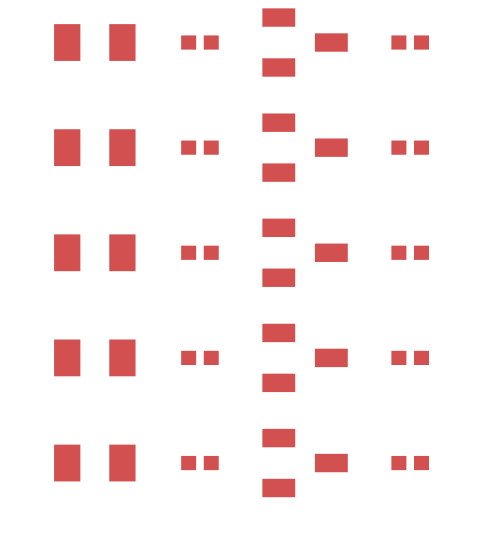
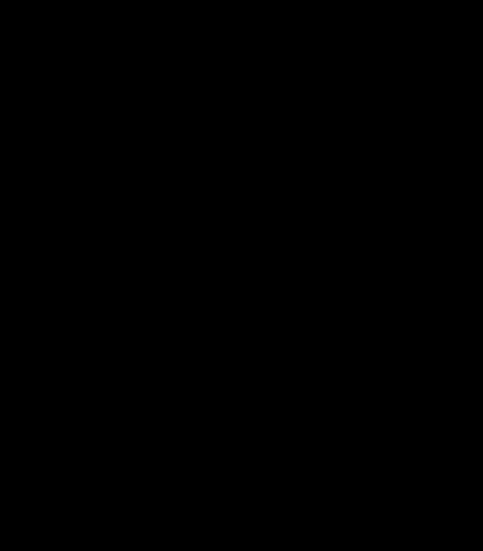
part: (94, 42) -> none
part: (199, 42) -> none
part: (305, 42) -> none
part: (410, 42) -> none
part: (94, 147) -> none
part: (199, 147) -> none
part: (305, 147) -> none
part: (410, 147) -> none
part: (94, 252) -> none
part: (199, 252) -> none
part: (305, 252) -> none
part: (410, 252) -> none
part: (94, 357) -> none
part: (199, 357) -> none
part: (305, 357) -> none
part: (410, 357) -> none
part: (94, 463) -> none
part: (199, 463) -> none
part: (305, 463) -> none
part: (410, 463) -> none

